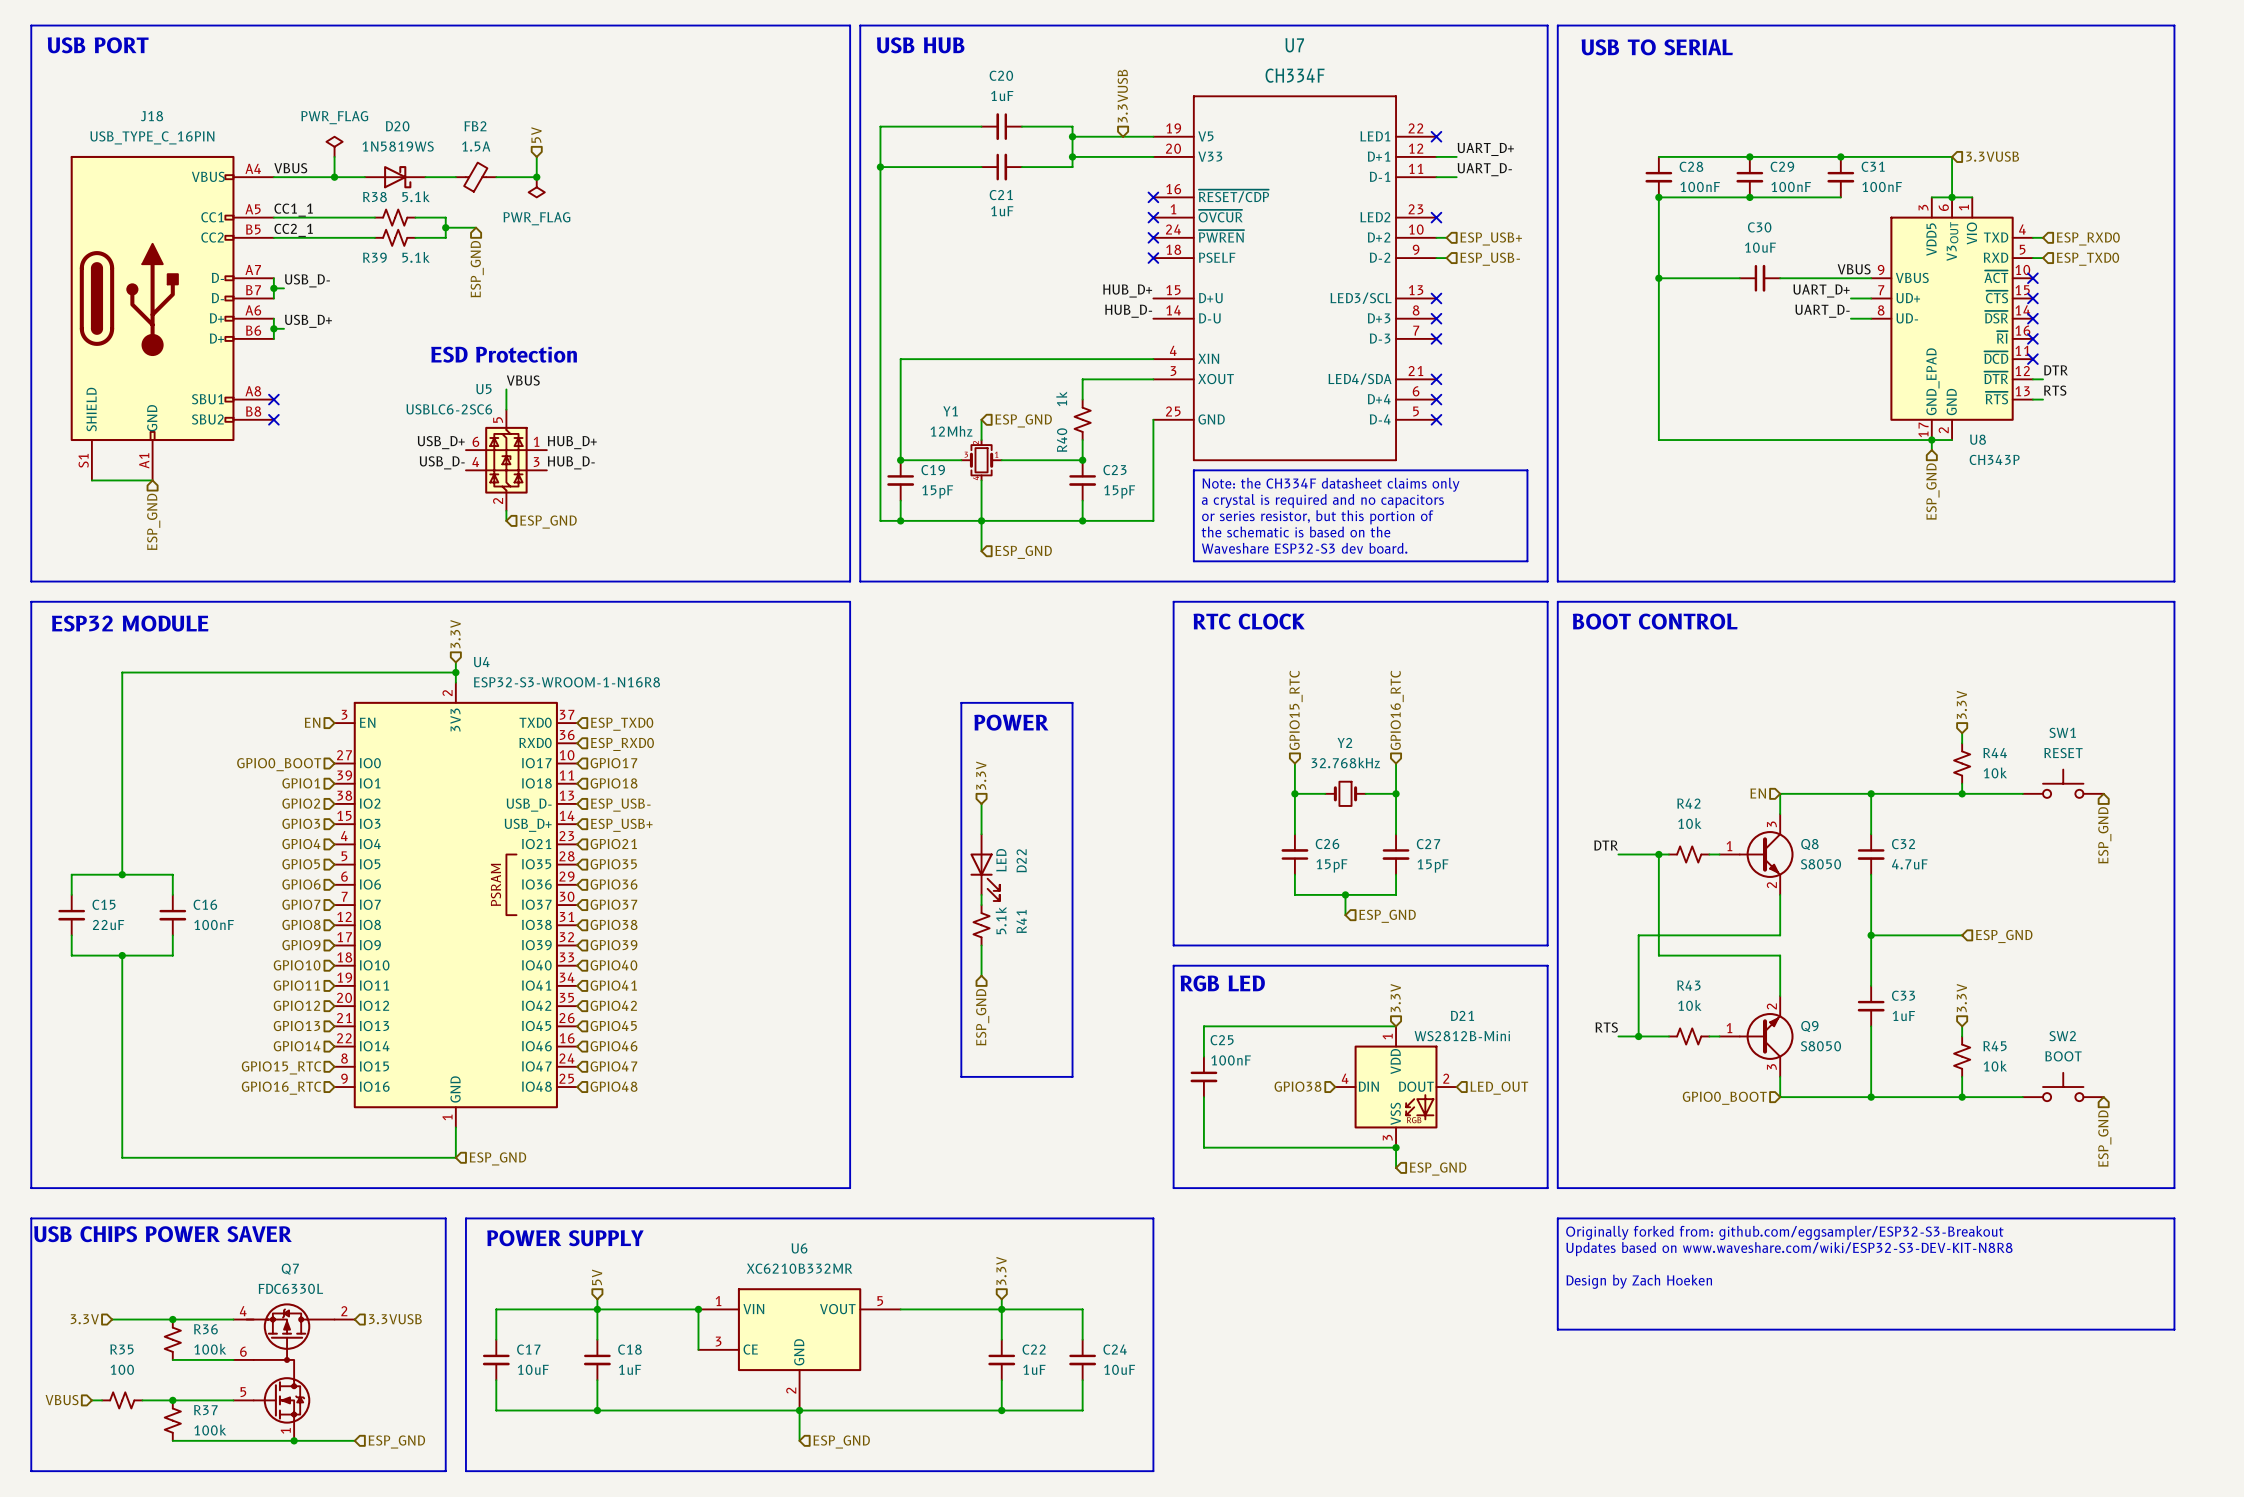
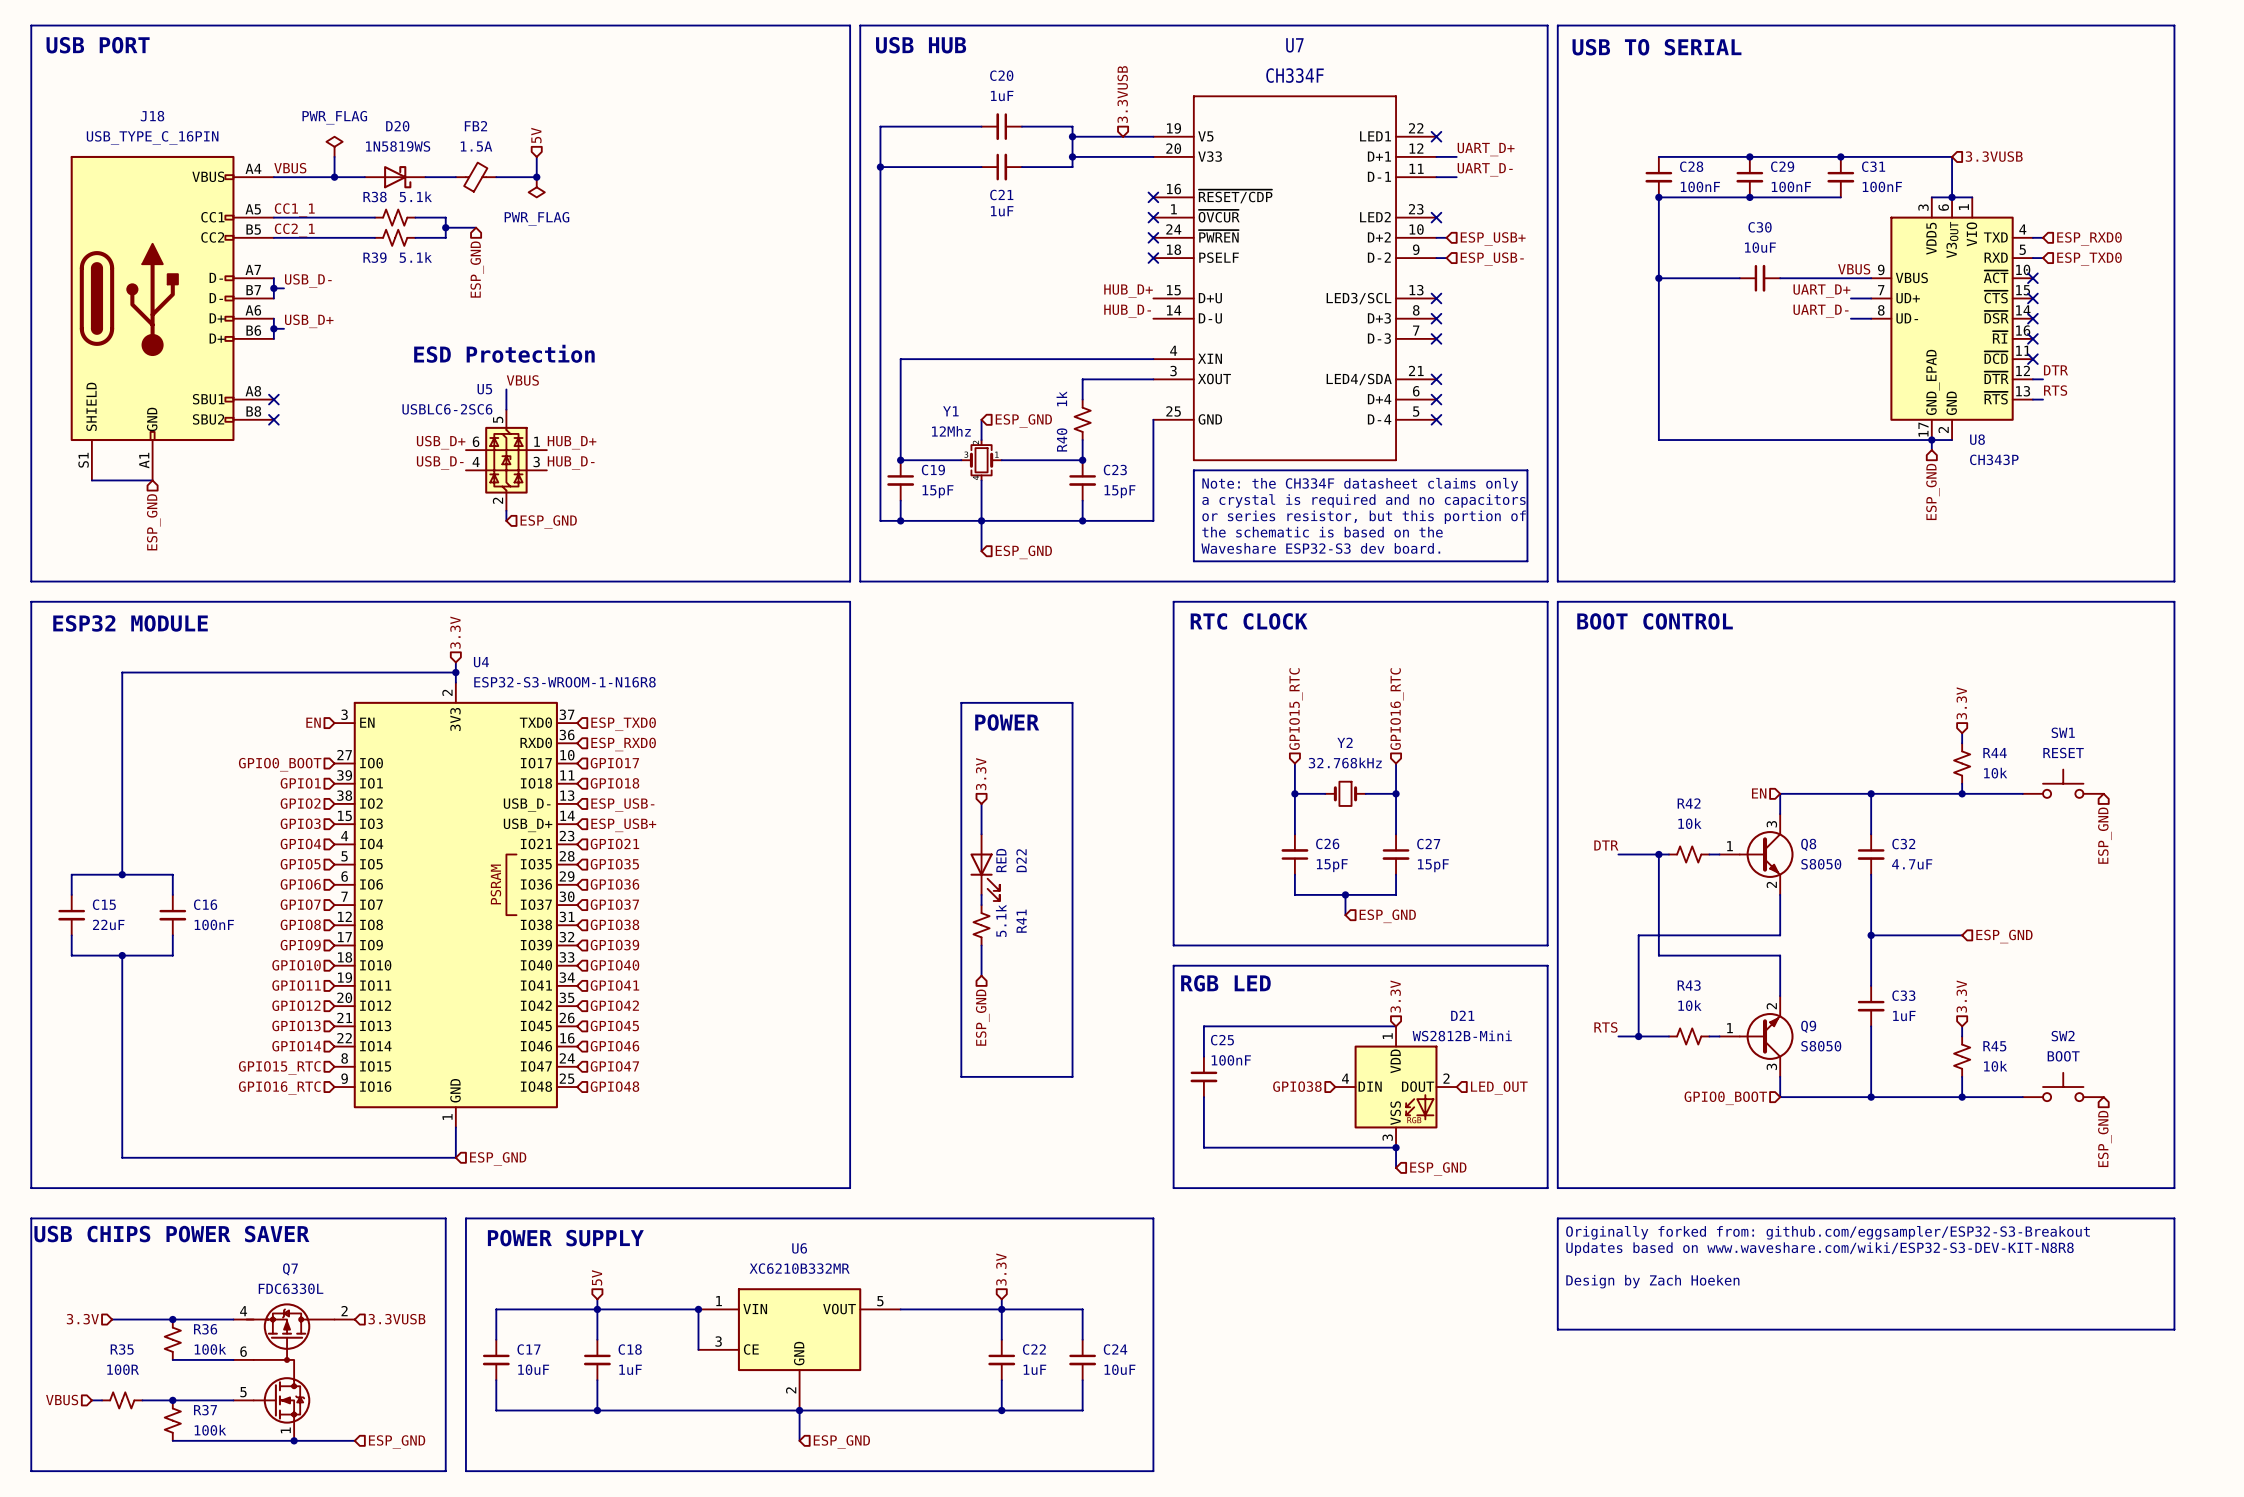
D22 value: LED (1001, 860) -> RED (1001, 860)
R35 value: 100 (122, 1369) -> 100R (123, 1369)

